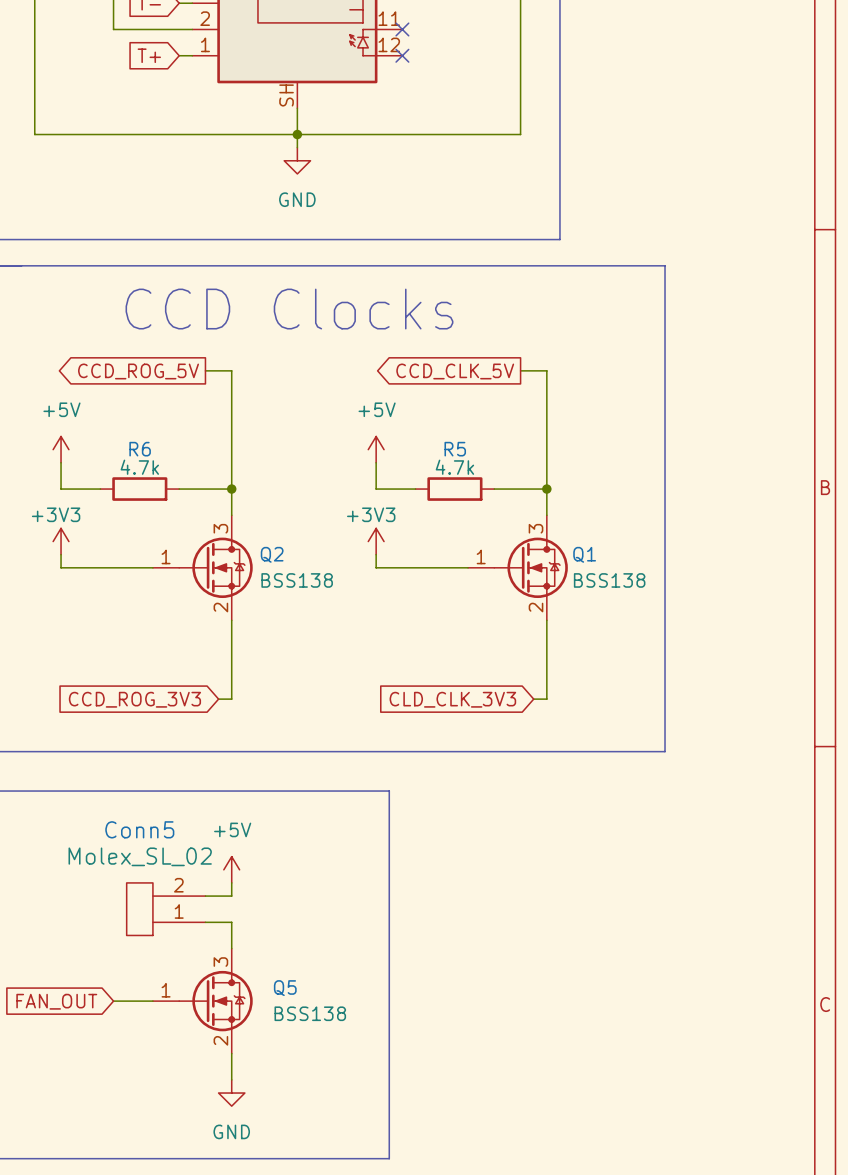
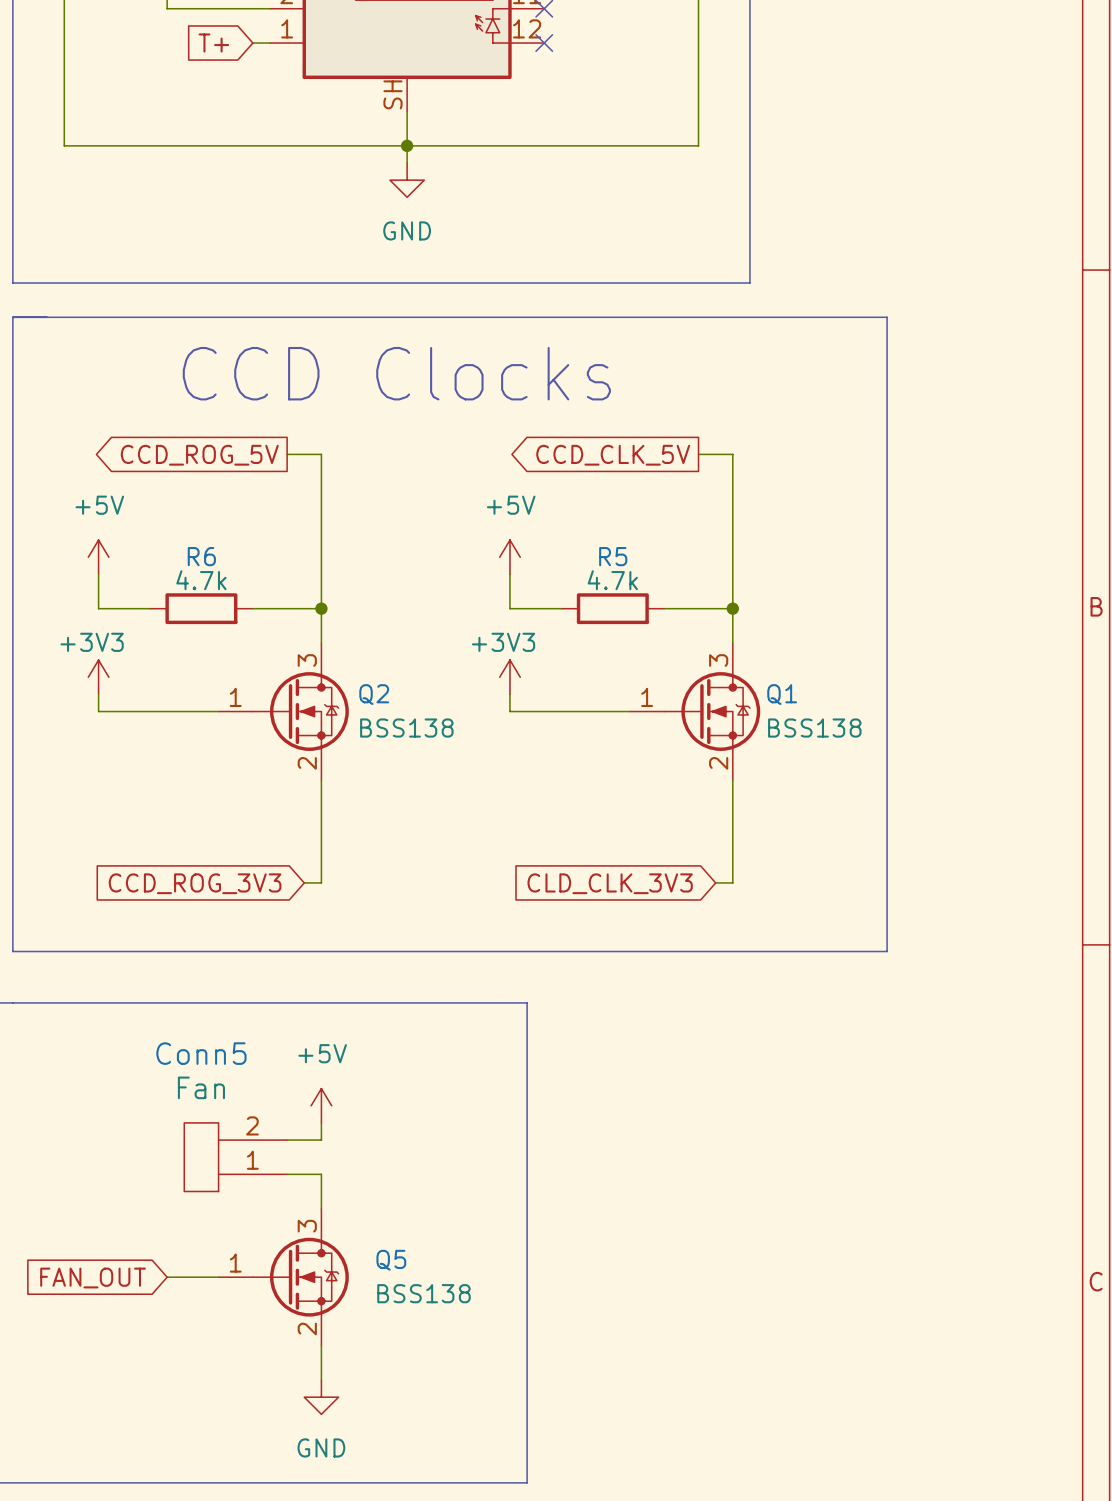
Conn5 value: Molex_SL_02 (140, 856) -> Fan (201, 1087)

